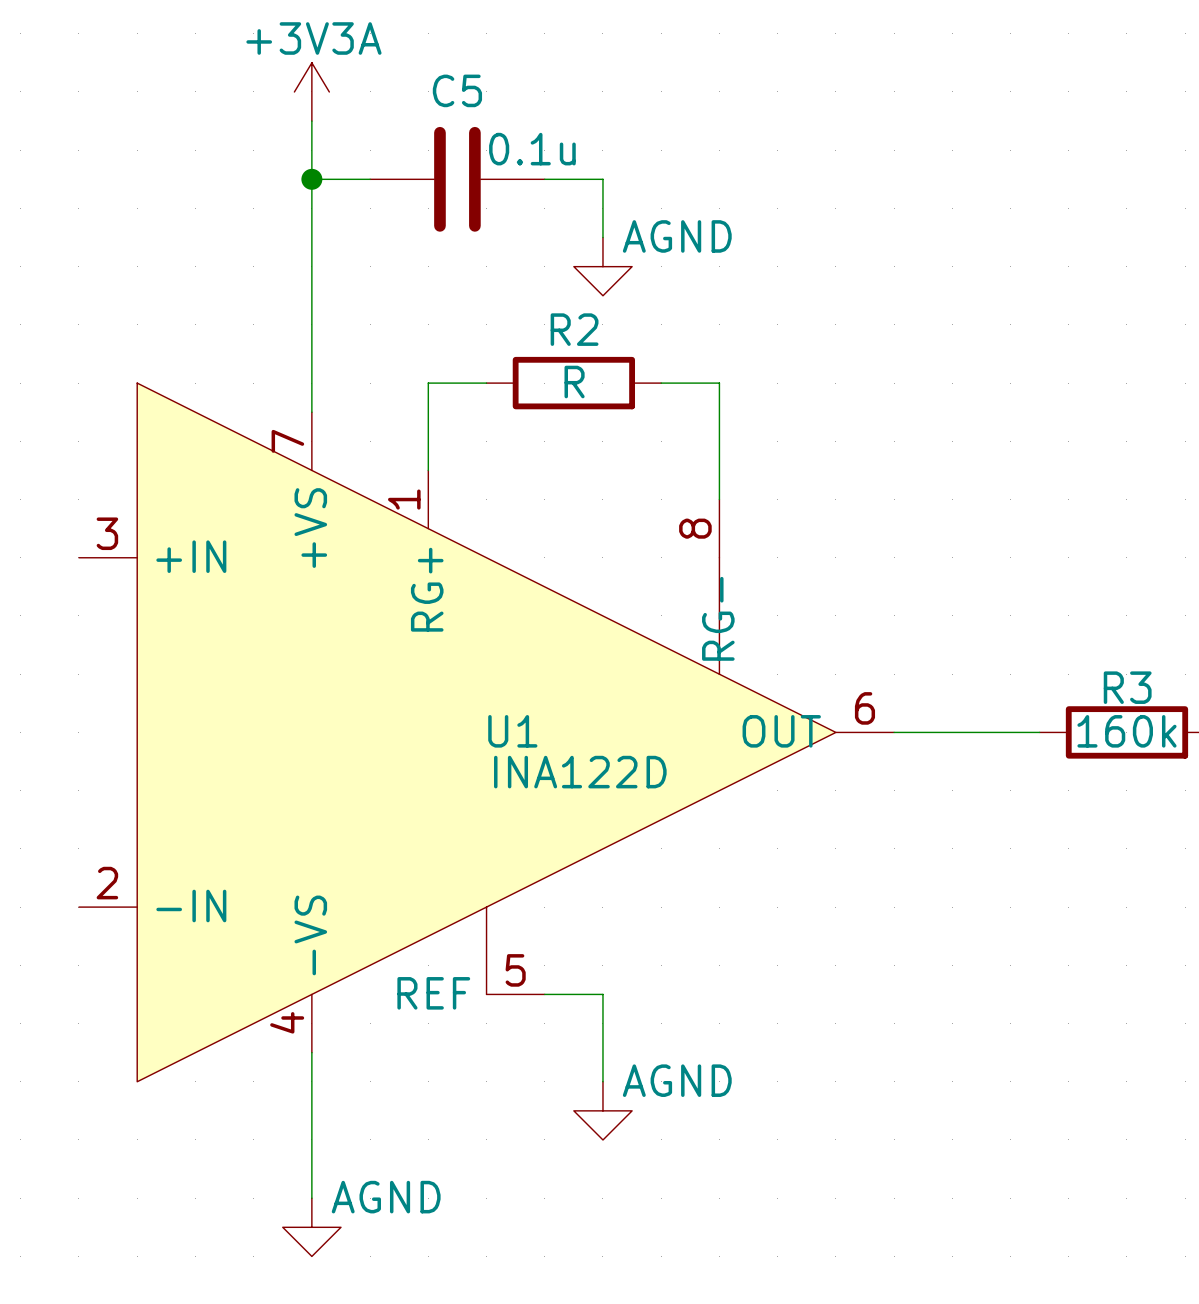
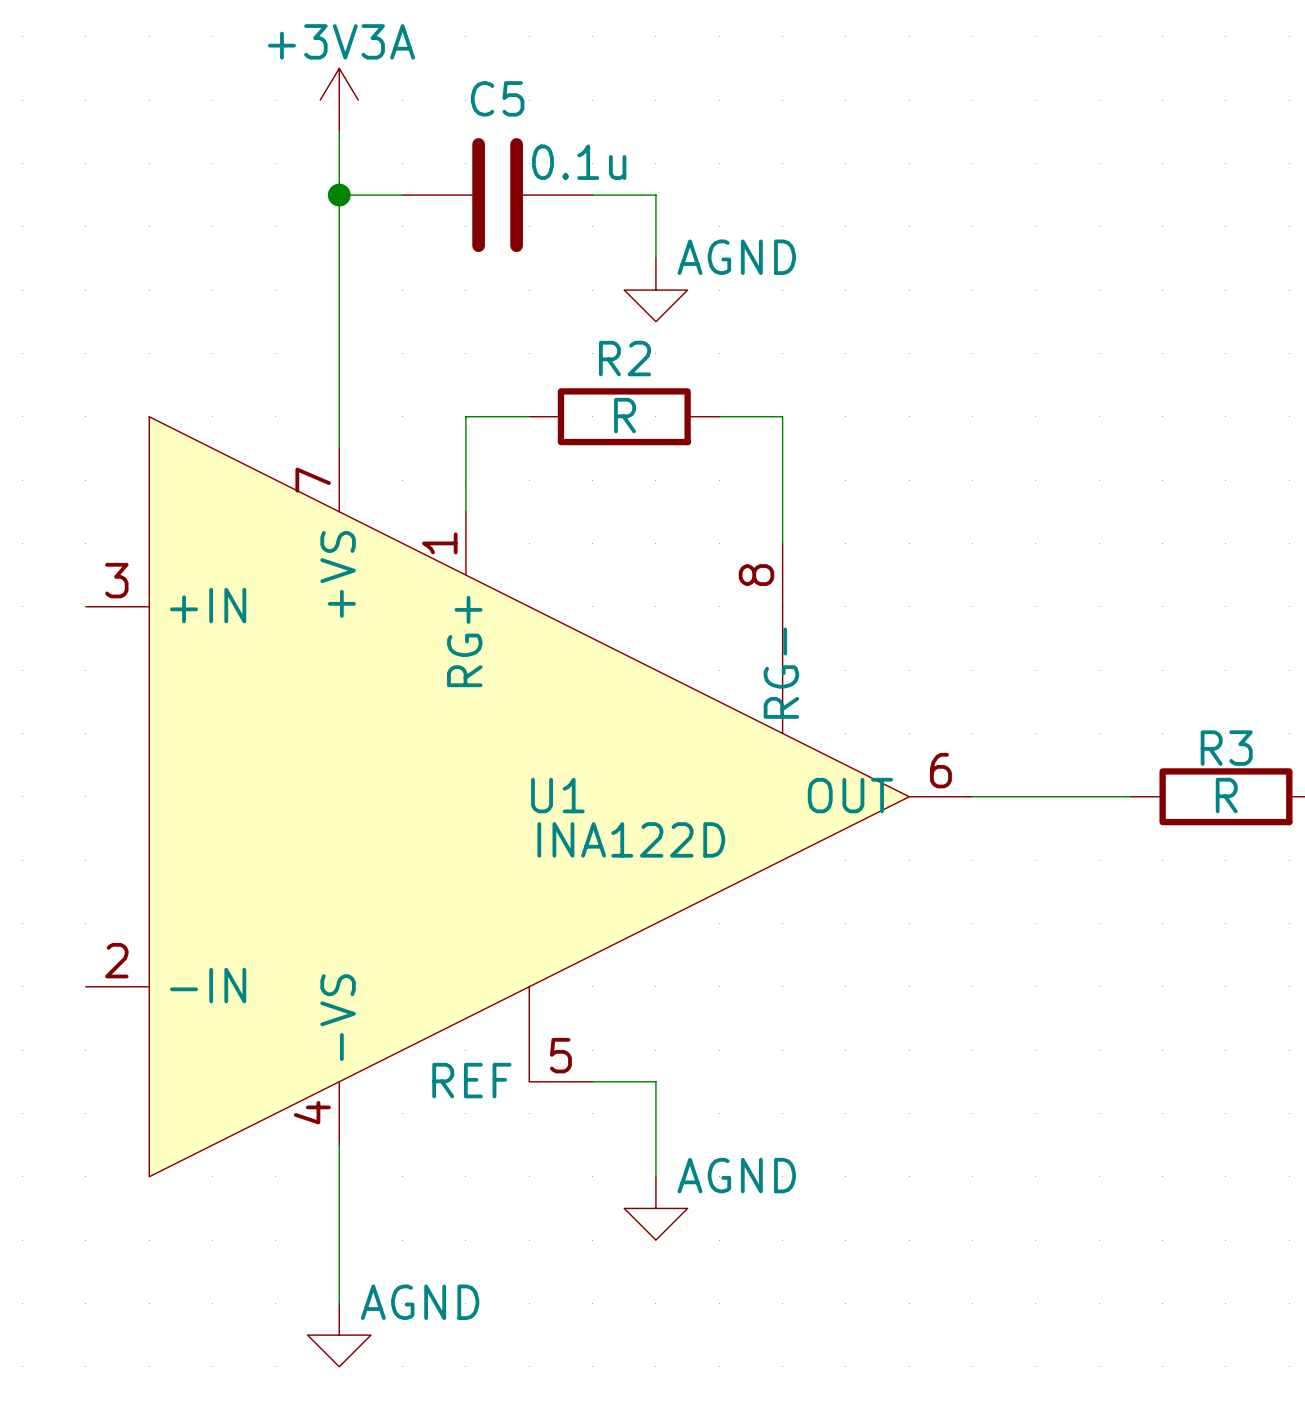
R3 value: 160k (1126, 731) -> R (1226, 795)

